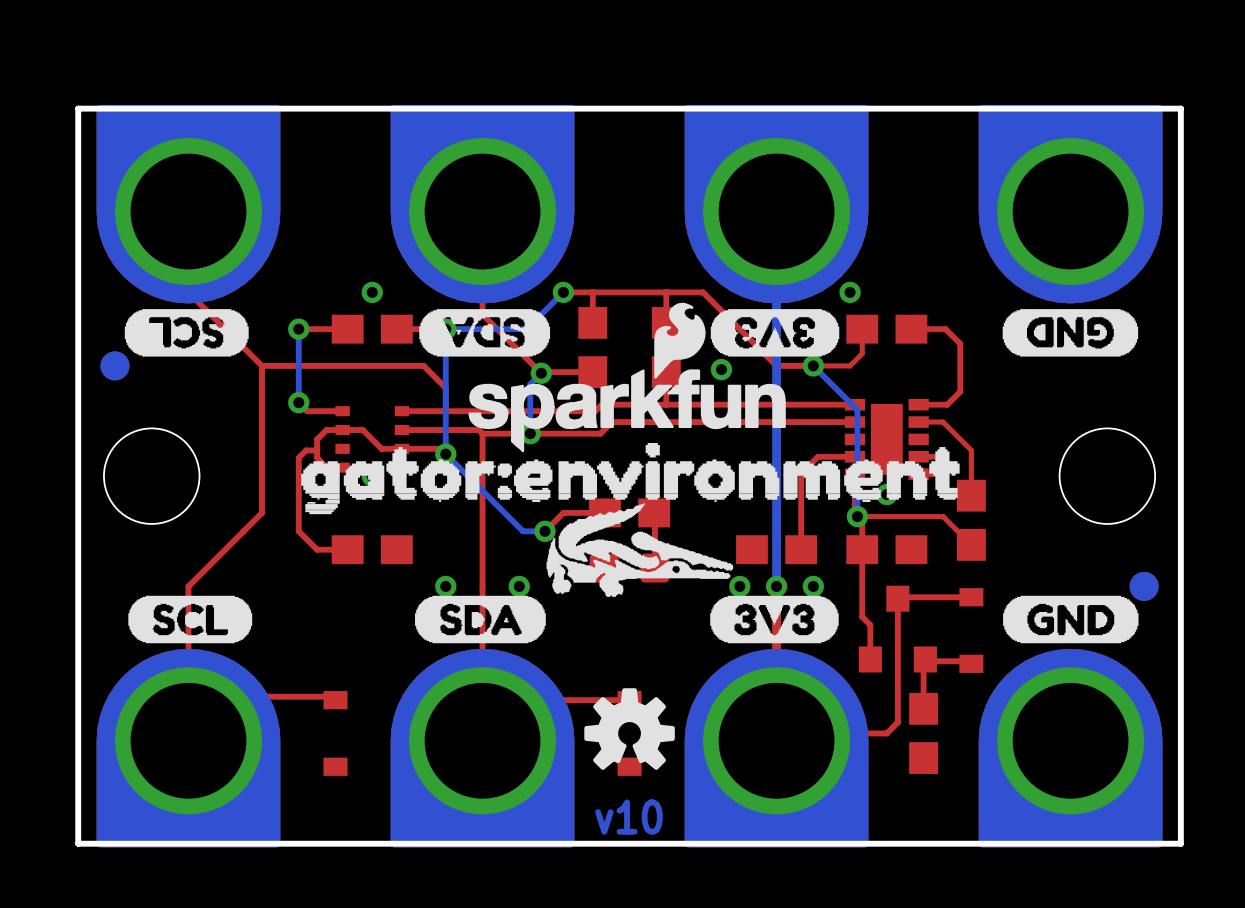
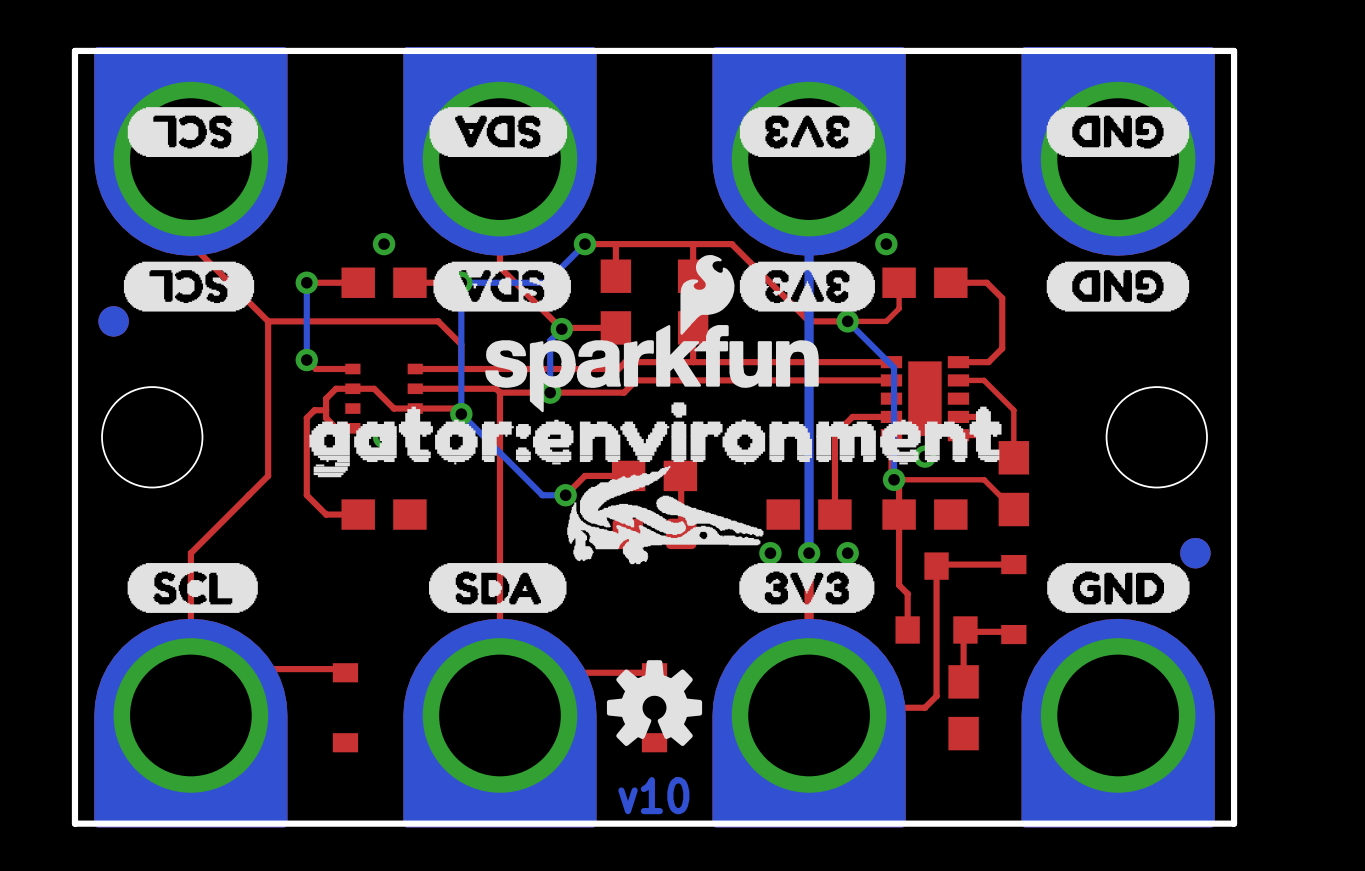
drawing: none -> [127, 107, 258, 158]
drawing: none -> [429, 107, 568, 158]
drawing: none -> [739, 107, 875, 158]
drawing: none -> [1046, 107, 1190, 158]
via: (721, 369) -> none
via: (445, 586) -> none
via: (519, 586) -> none

